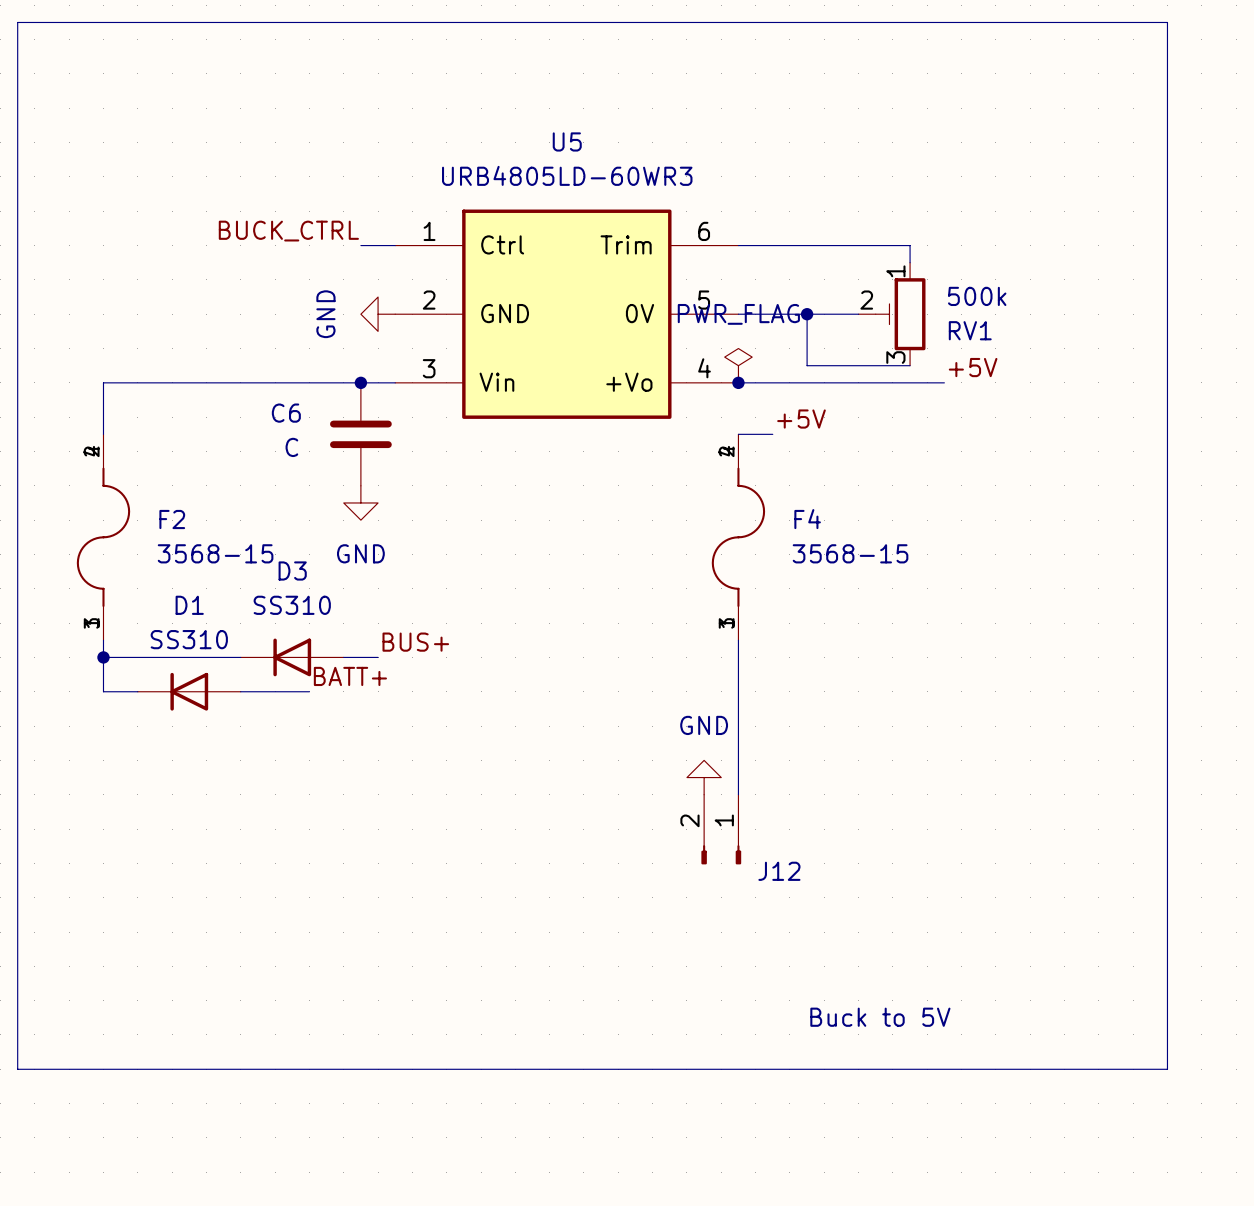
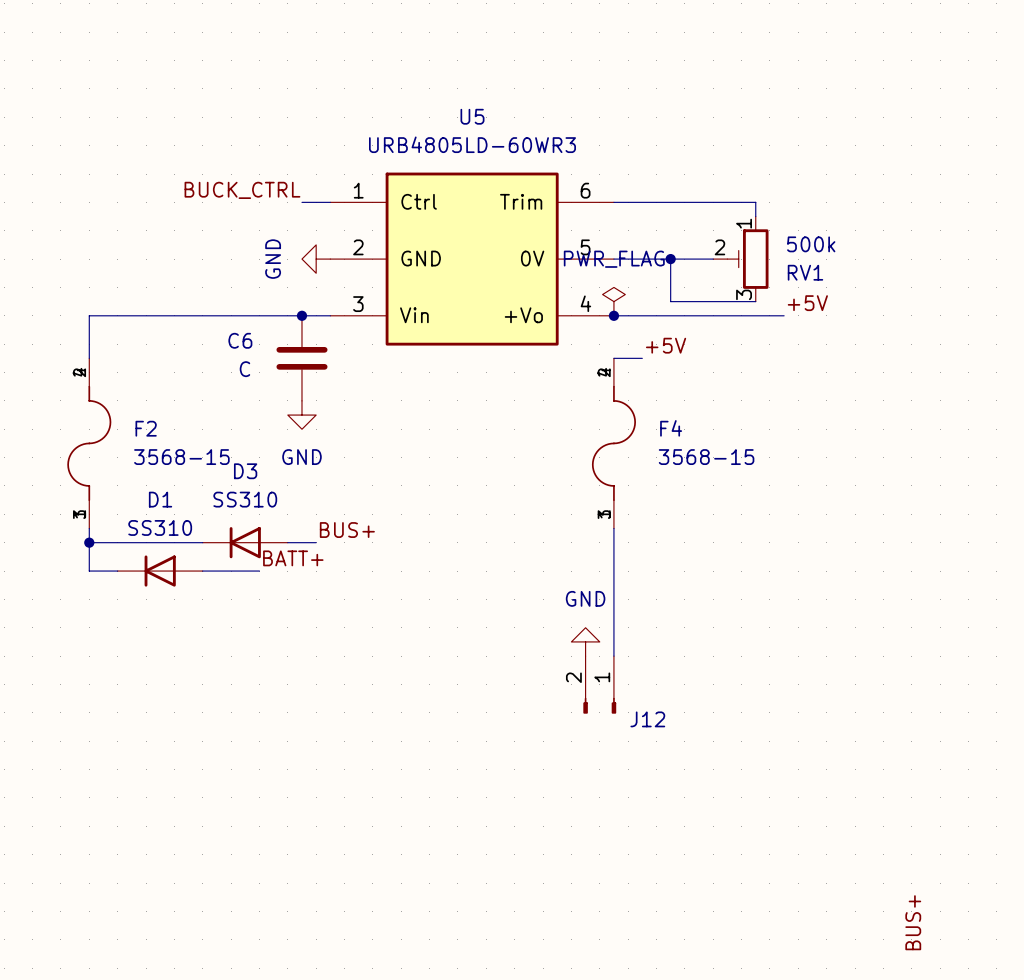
line: (17, 22) (1167, 22) (1167, 1069) (17, 1069) (17, 22) -> none
text: Buck to 5V (880, 1017) -> none
label: none -> BUS+ (913, 922)

